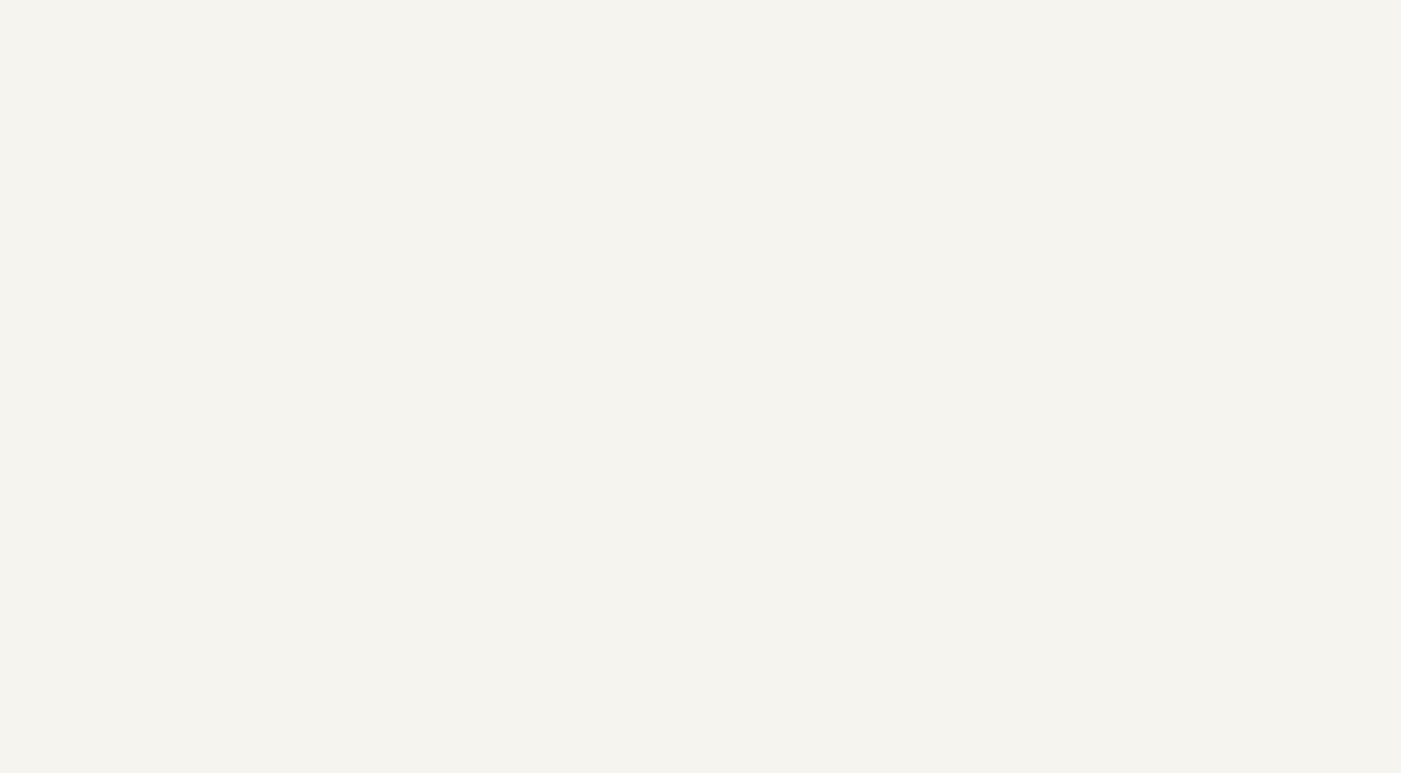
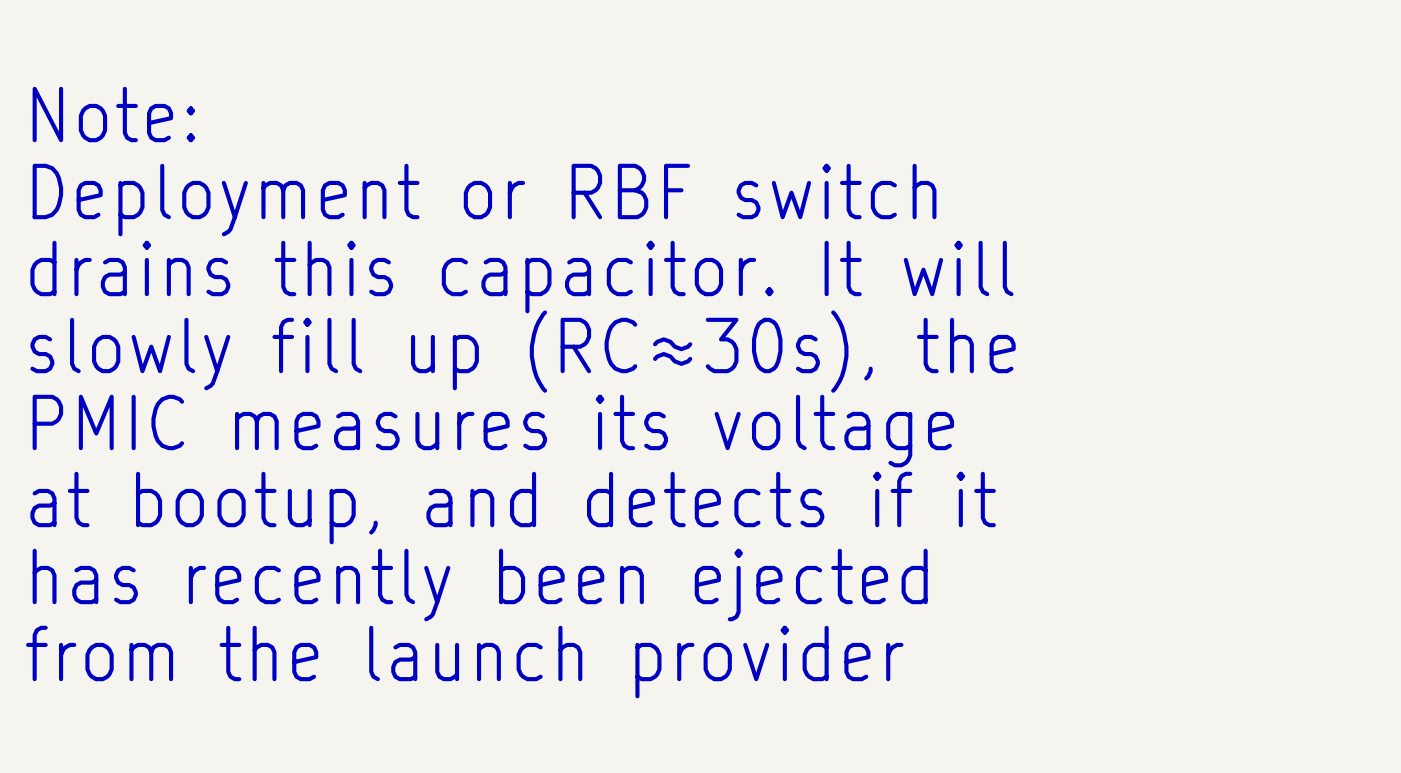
text: none -> Note: (113, 114)
text: none -> Deployment or RBF switch (484, 200)
text: none -> drains this capacitor. It will (521, 277)
text: none -> slowly fill up (RC≈30s), the (523, 351)
text: none -> PMIC measures its voltage (493, 431)
text: none -> at bootup, and detects if it (513, 508)
text: none -> has recently been ejected (480, 585)
text: none -> from the launch provider (464, 662)

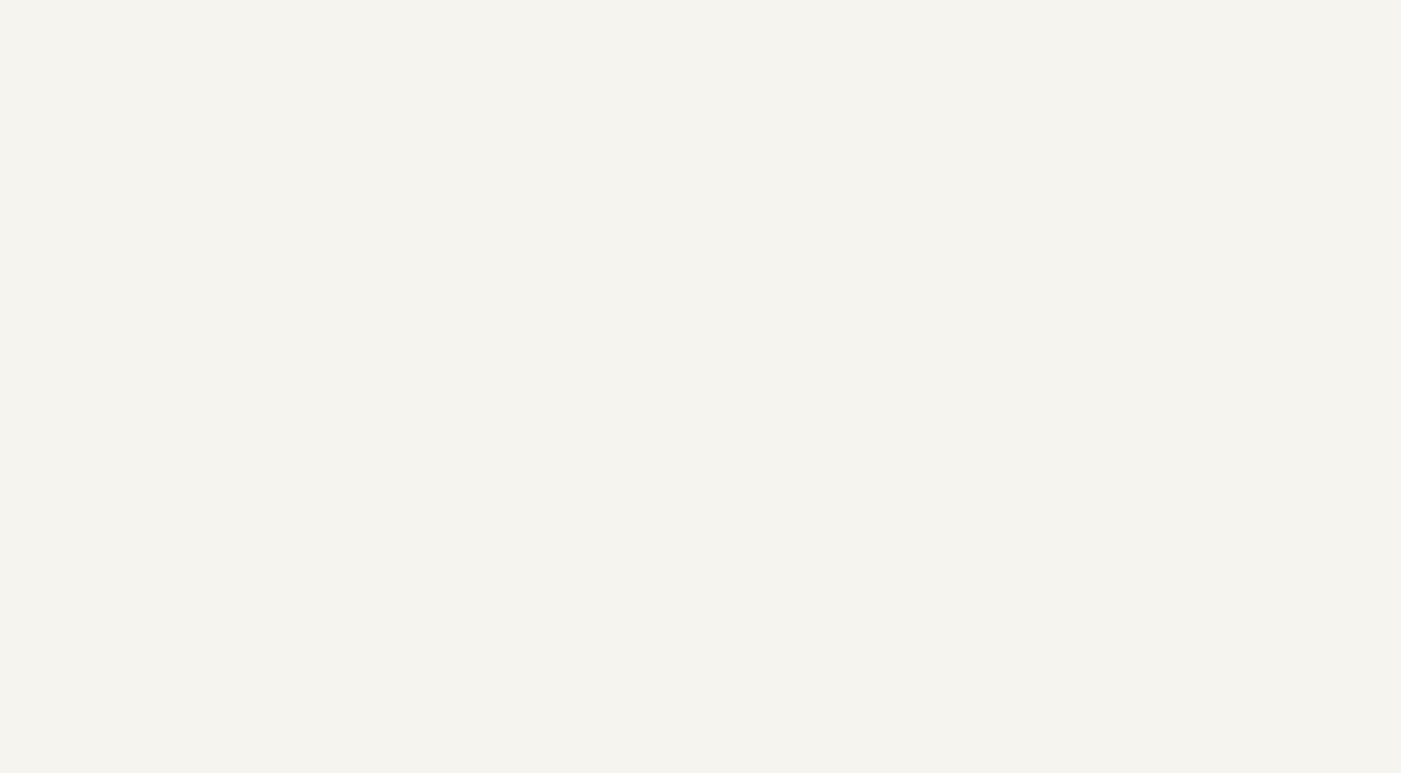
text: Note: (113, 114) -> none
text: Deployment or RBF switch (484, 200) -> none
text: drains this capacitor. It will (521, 277) -> none
text: slowly fill up (RC≈30s), the (523, 351) -> none
text: PMIC measures its voltage (493, 431) -> none
text: at bootup, and detects if it (513, 508) -> none
text: has recently been ejected (480, 585) -> none
text: from the launch provider (464, 662) -> none

